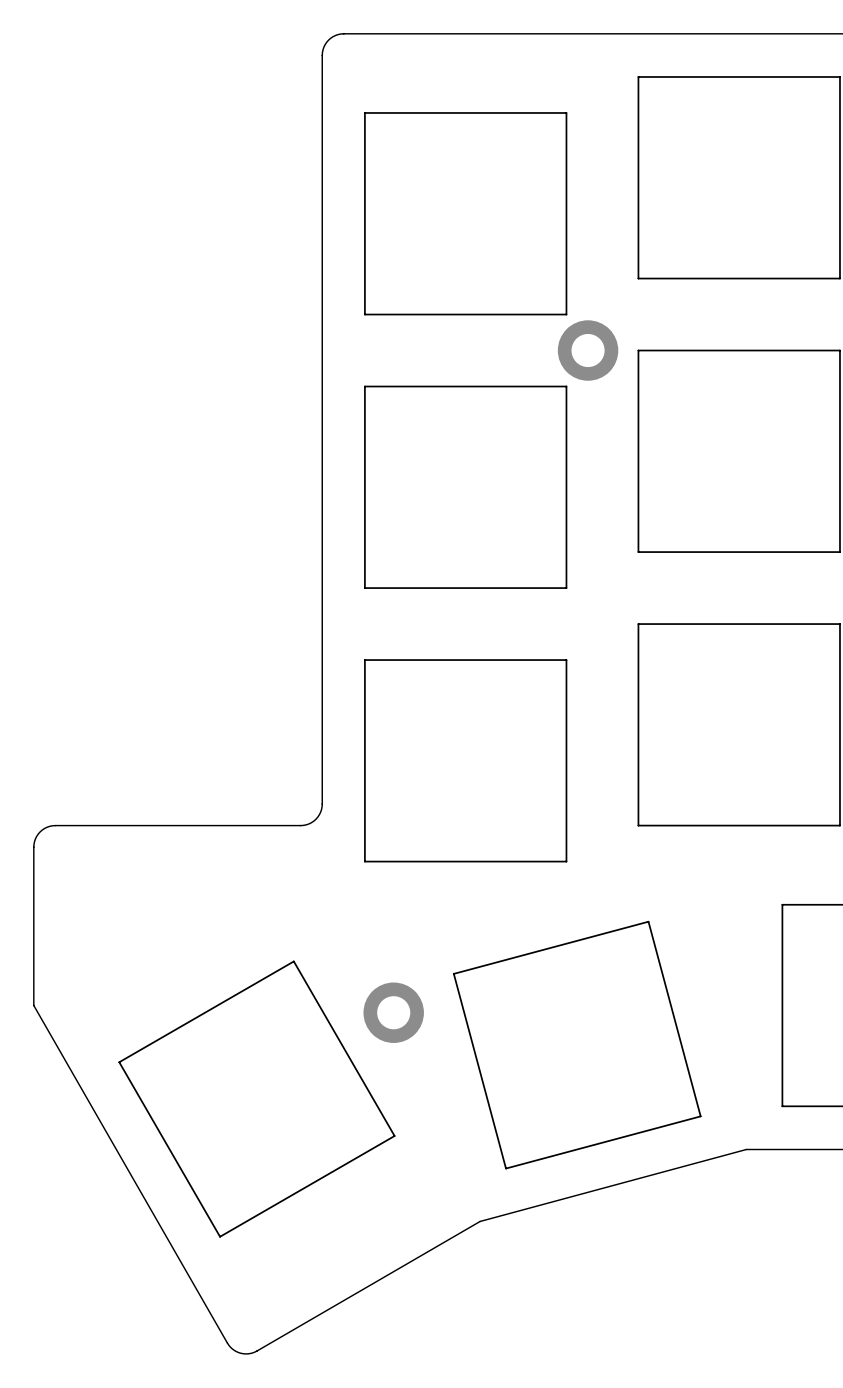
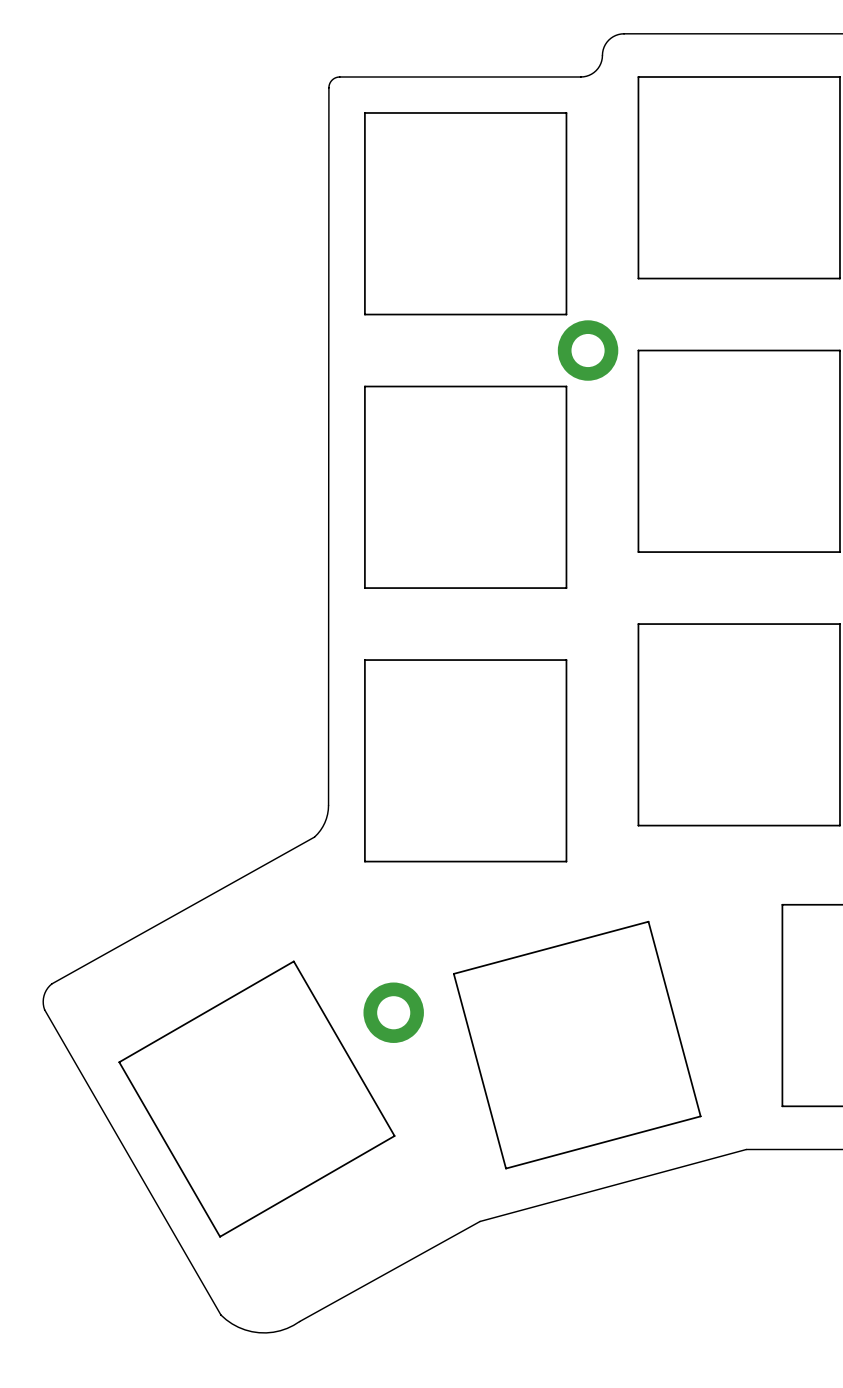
board edge: (624, 33) (343, 33) (333, 36) (326, 42) (322, 55) (322, 803) (320, 812) (313, 821) (300, 825) (52, 825) (40, 831) (33, 844) (33, 1005) (232, 1348) (242, 1353) (256, 1351) (480, 1221) -> (624, 33) (615, 35) (608, 40) (604, 47) (601, 60) (597, 68) (591, 74) (583, 76) (339, 77) (330, 82) (328, 805) (326, 818) (314, 837) (51, 983) (46, 990) (43, 998) (44, 1009) (220, 1315) (238, 1327) (252, 1331) (266, 1332) (287, 1328) (480, 1221)

